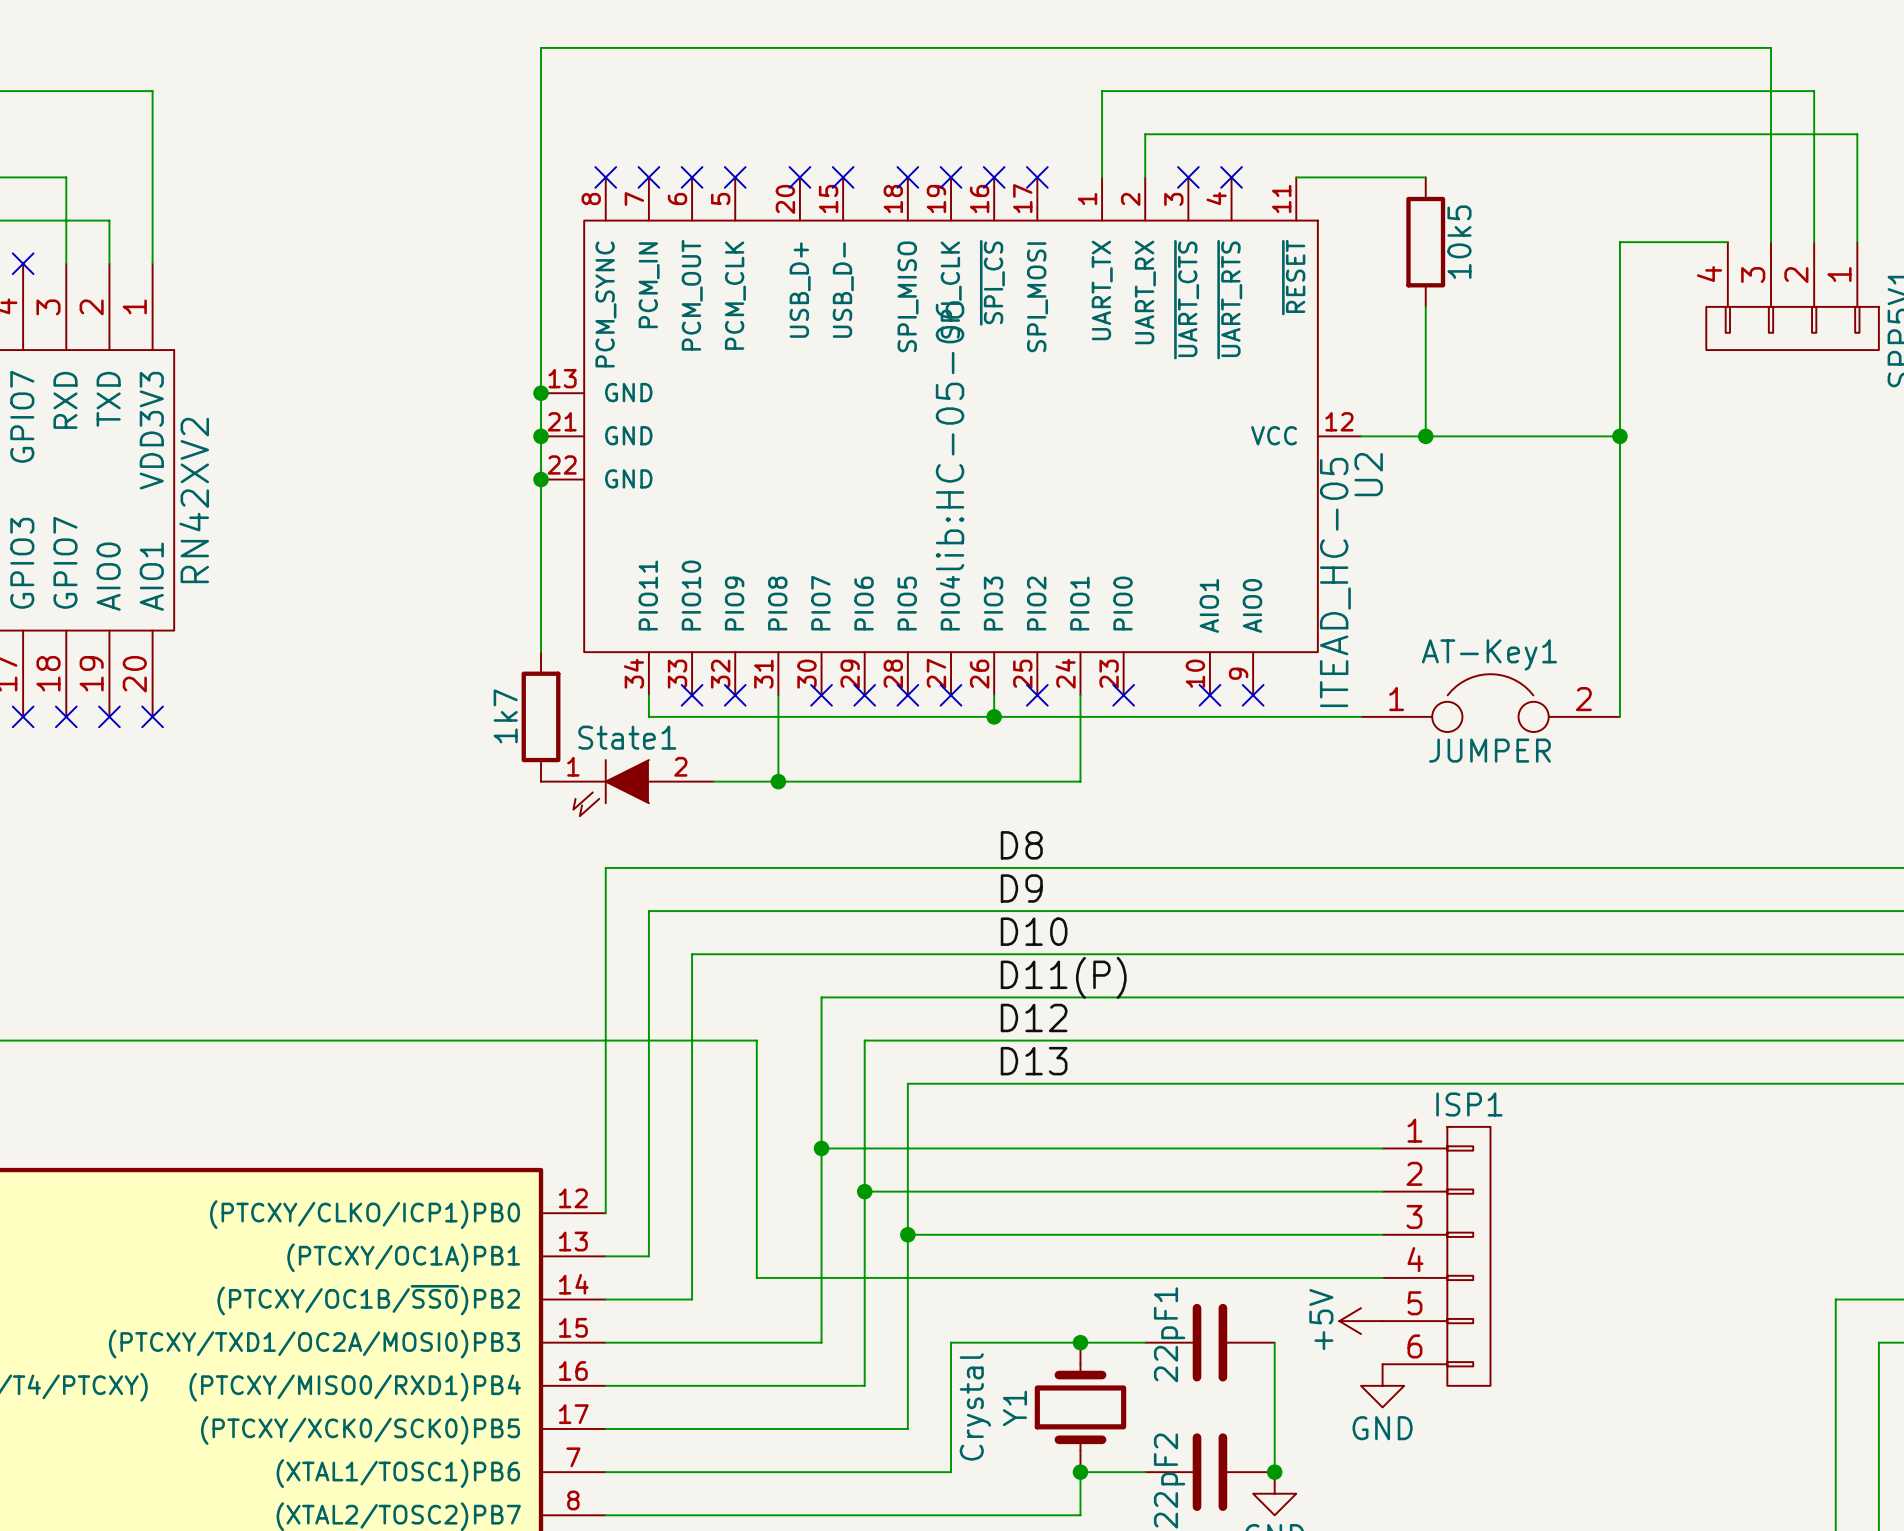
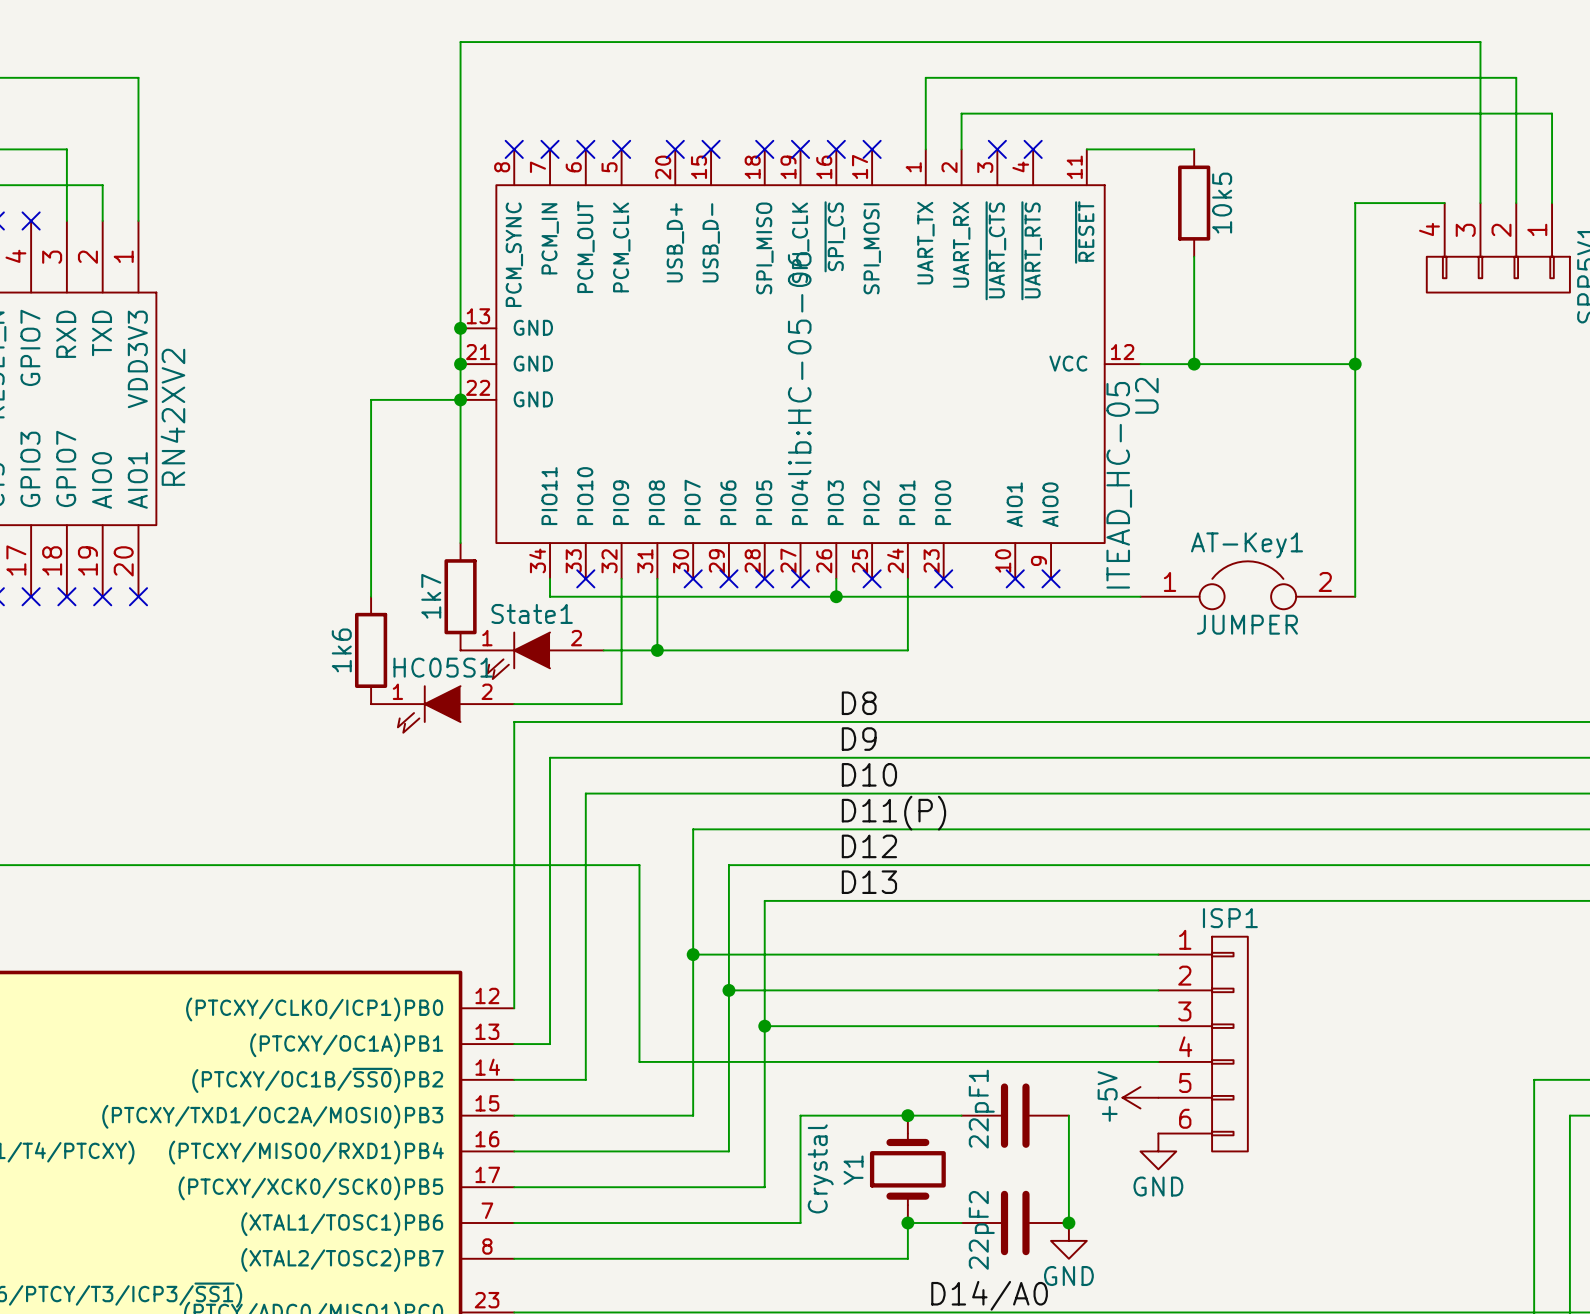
wire: none -> (460, 399) (371, 399) (371, 596)
wire: none -> (621, 578) (621, 704) (514, 704)
no-connect mark: (735, 695) -> none
1k6: none -> (371, 650)
HC05S1: none -> (442, 709)

